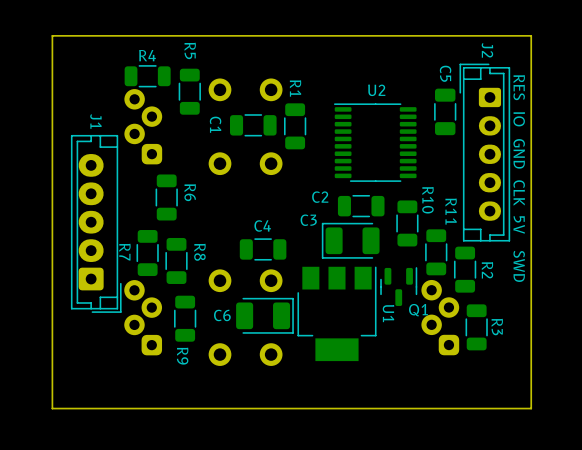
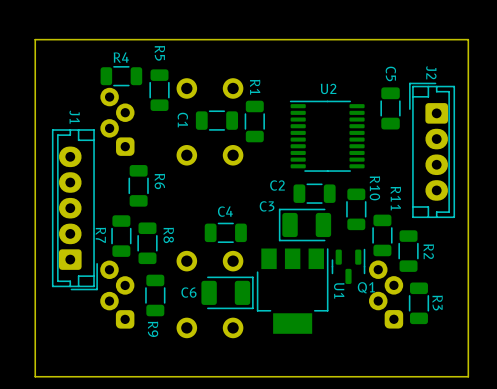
J2 footprint: [459, 63, 511, 242] -> [409, 82, 455, 218]
text: RES (519, 87) -> none
text: IO (519, 119) -> none
text: GND (519, 153) -> none
text: CLK (519, 193) -> none
text: 5V (519, 224) -> none
text: SWD (519, 266) -> none

